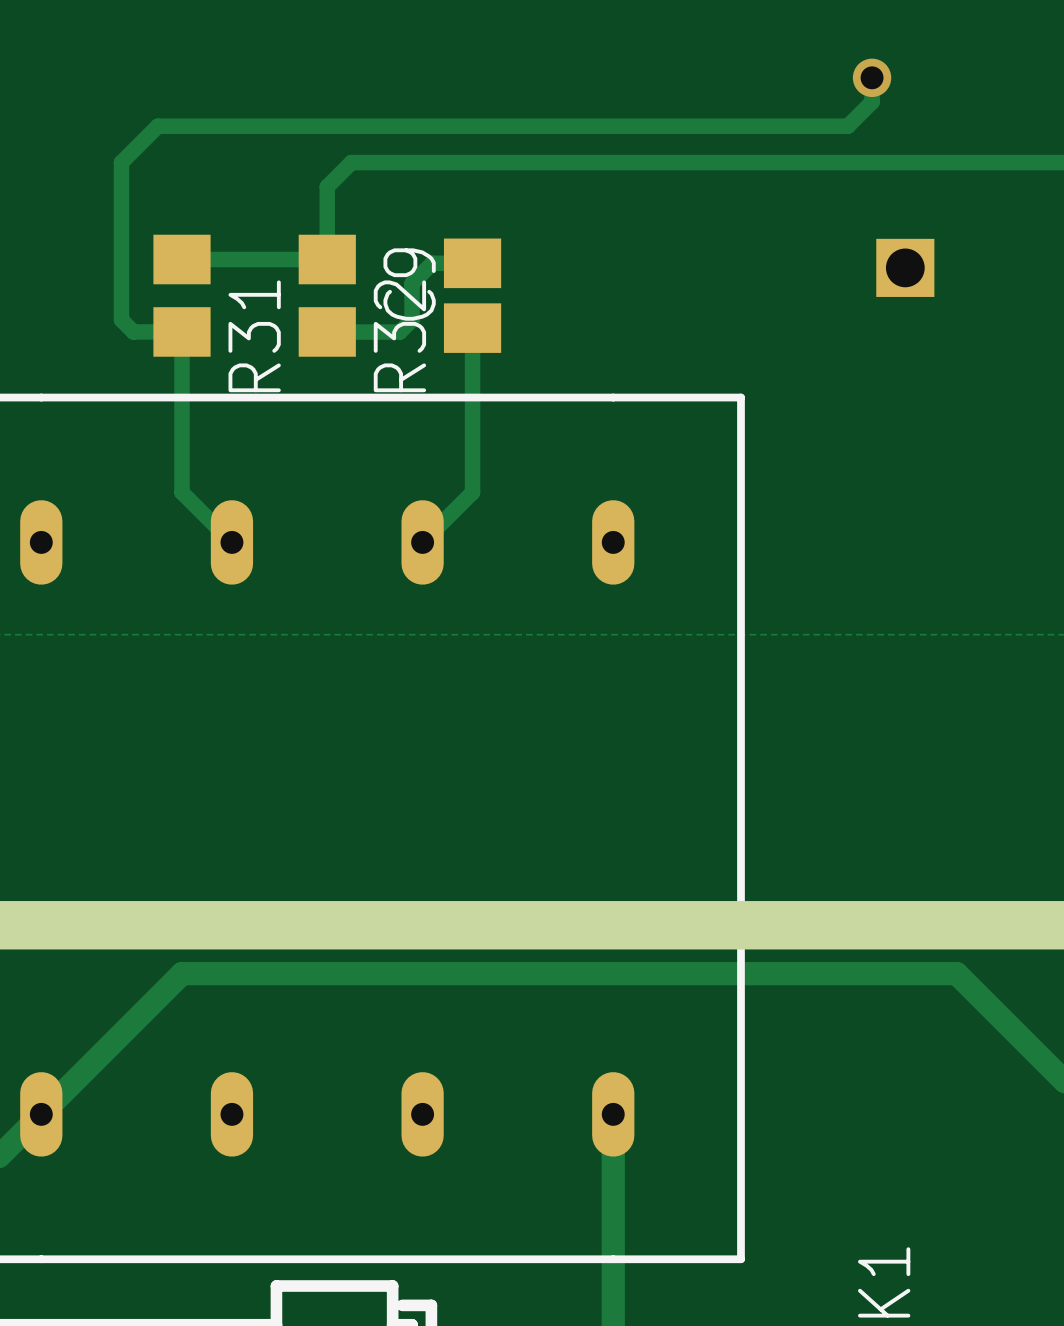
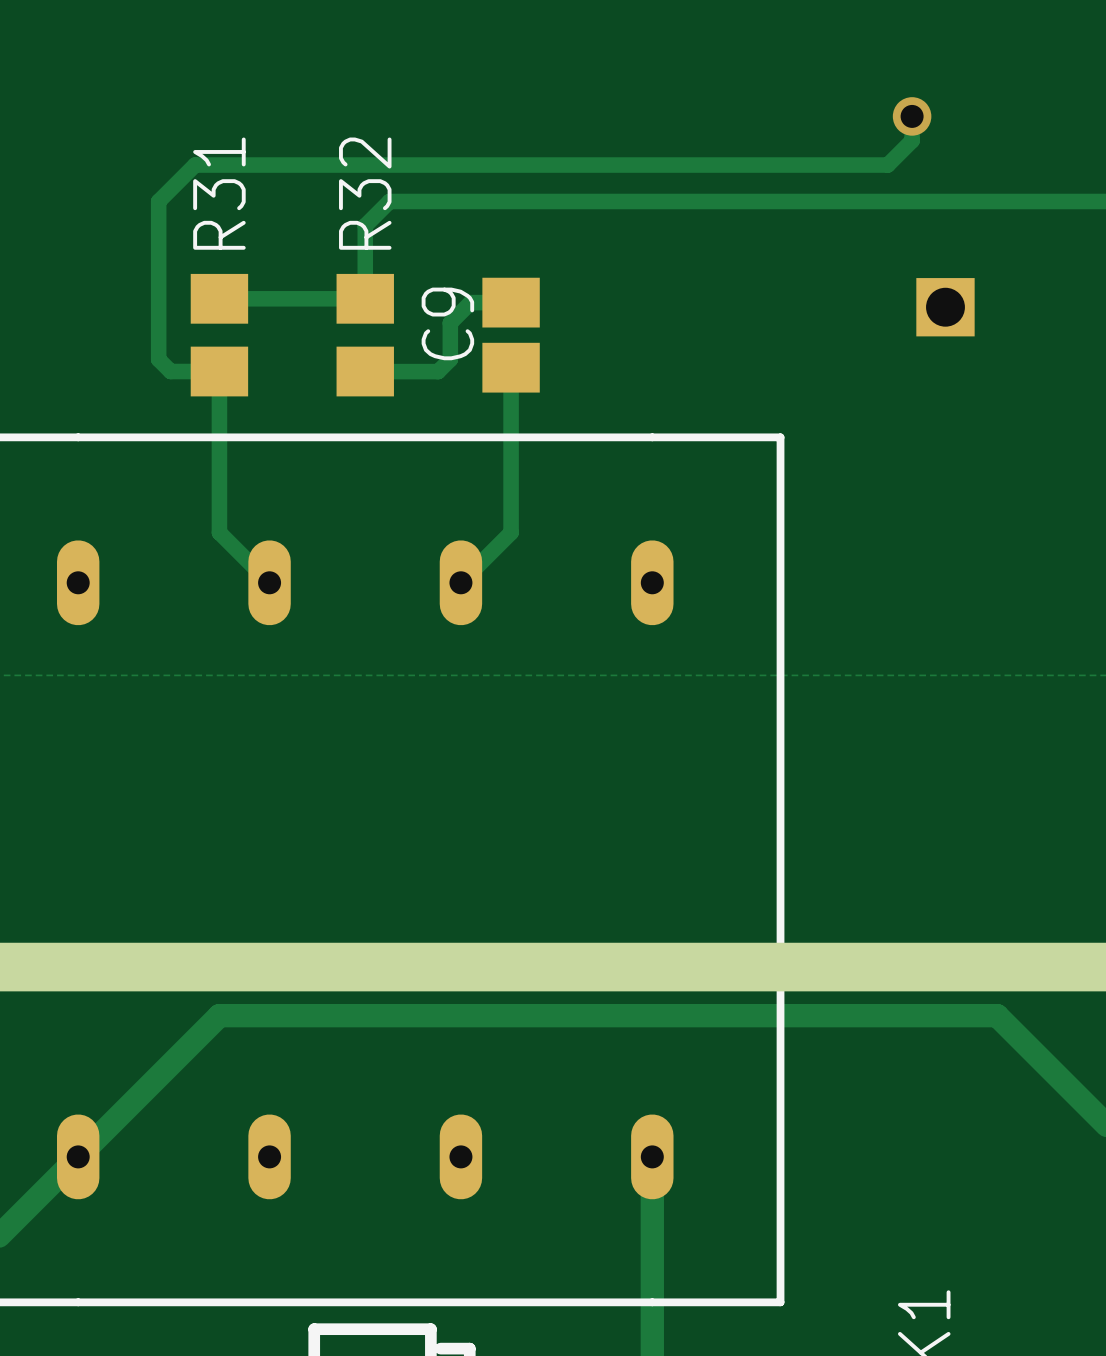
R31 name position: R31 (254, 336) -> R31 (219, 193)
R32 name position: R32 (399, 336) -> R32 (365, 193)

